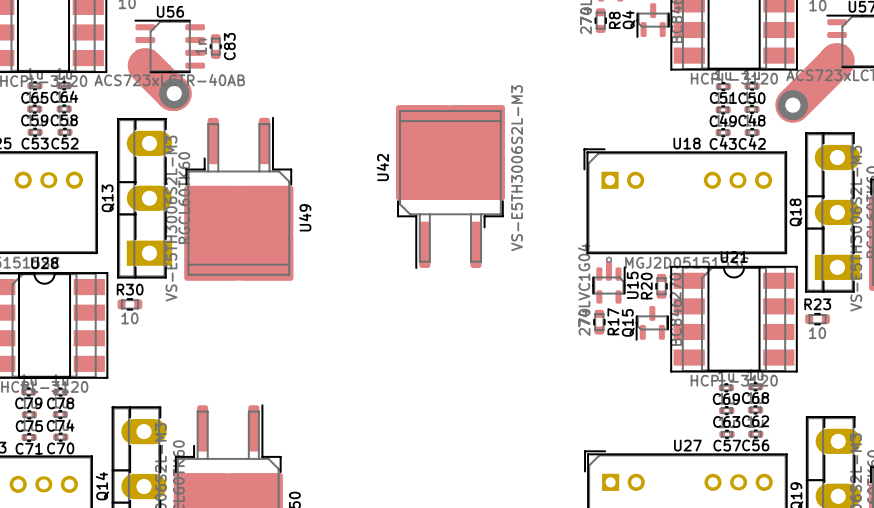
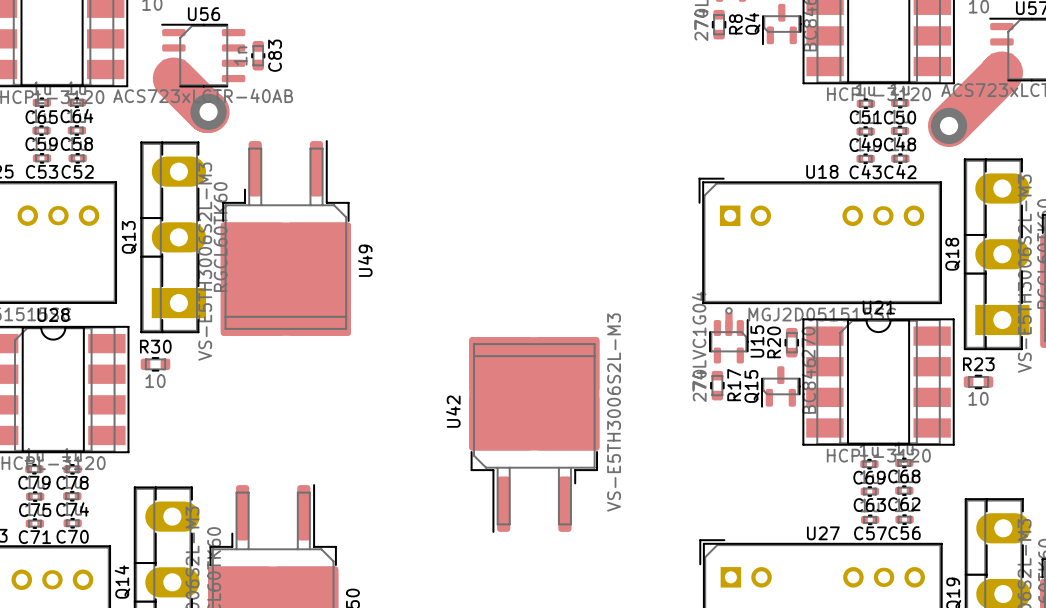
U42 position: (450, 186) -> (534, 434)

